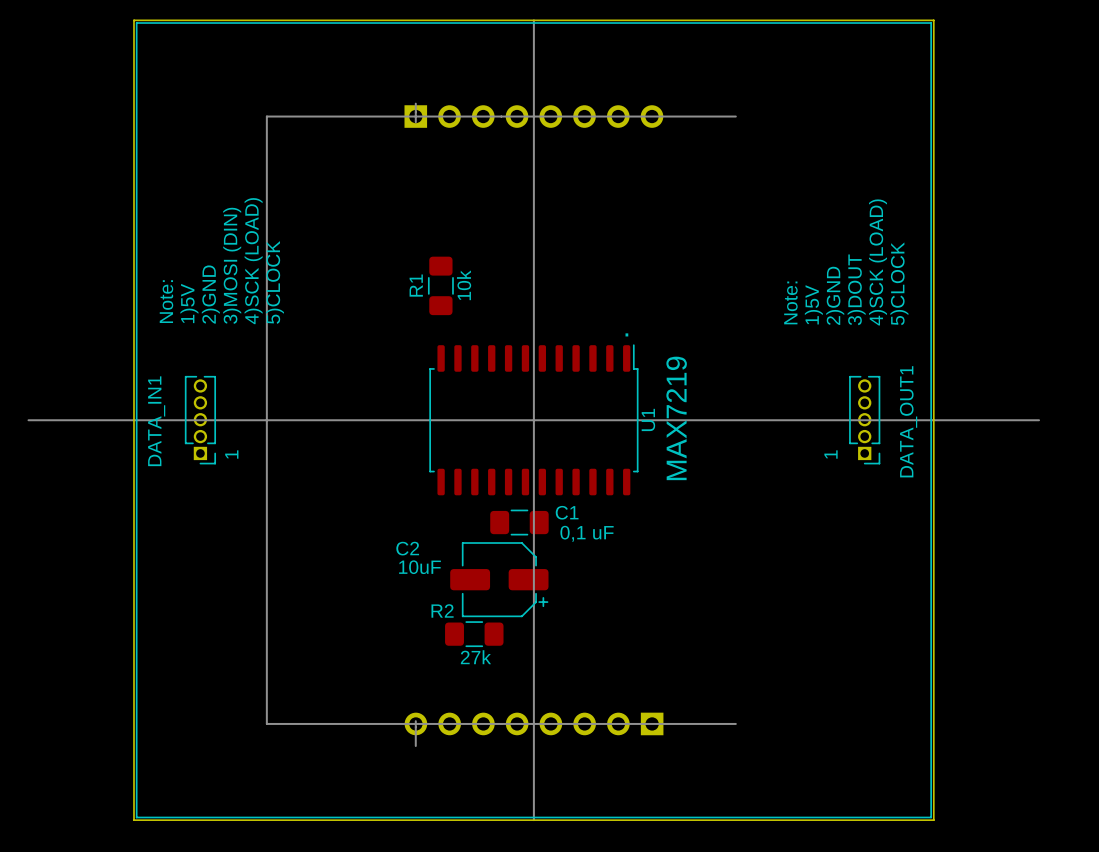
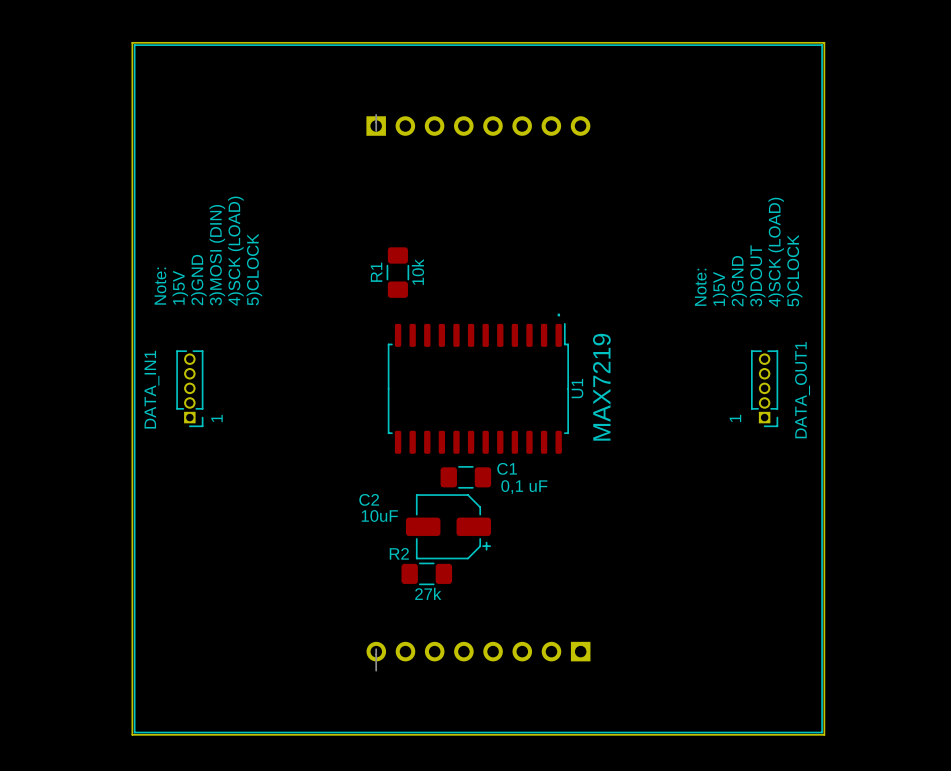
line: (533, 20) (533, 820) -> none
line: (735, 116) (266, 116) (266, 723) (735, 723) -> none
line: (28, 420) (1039, 420) -> none

